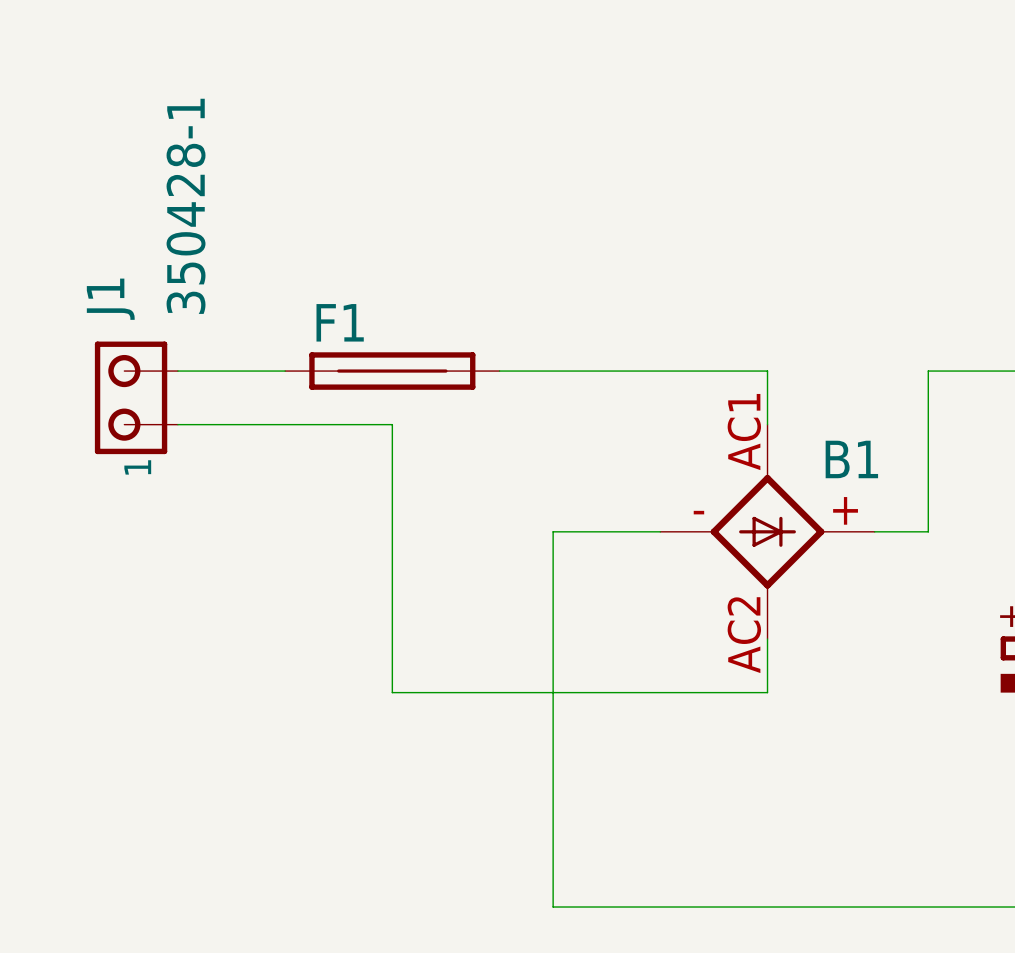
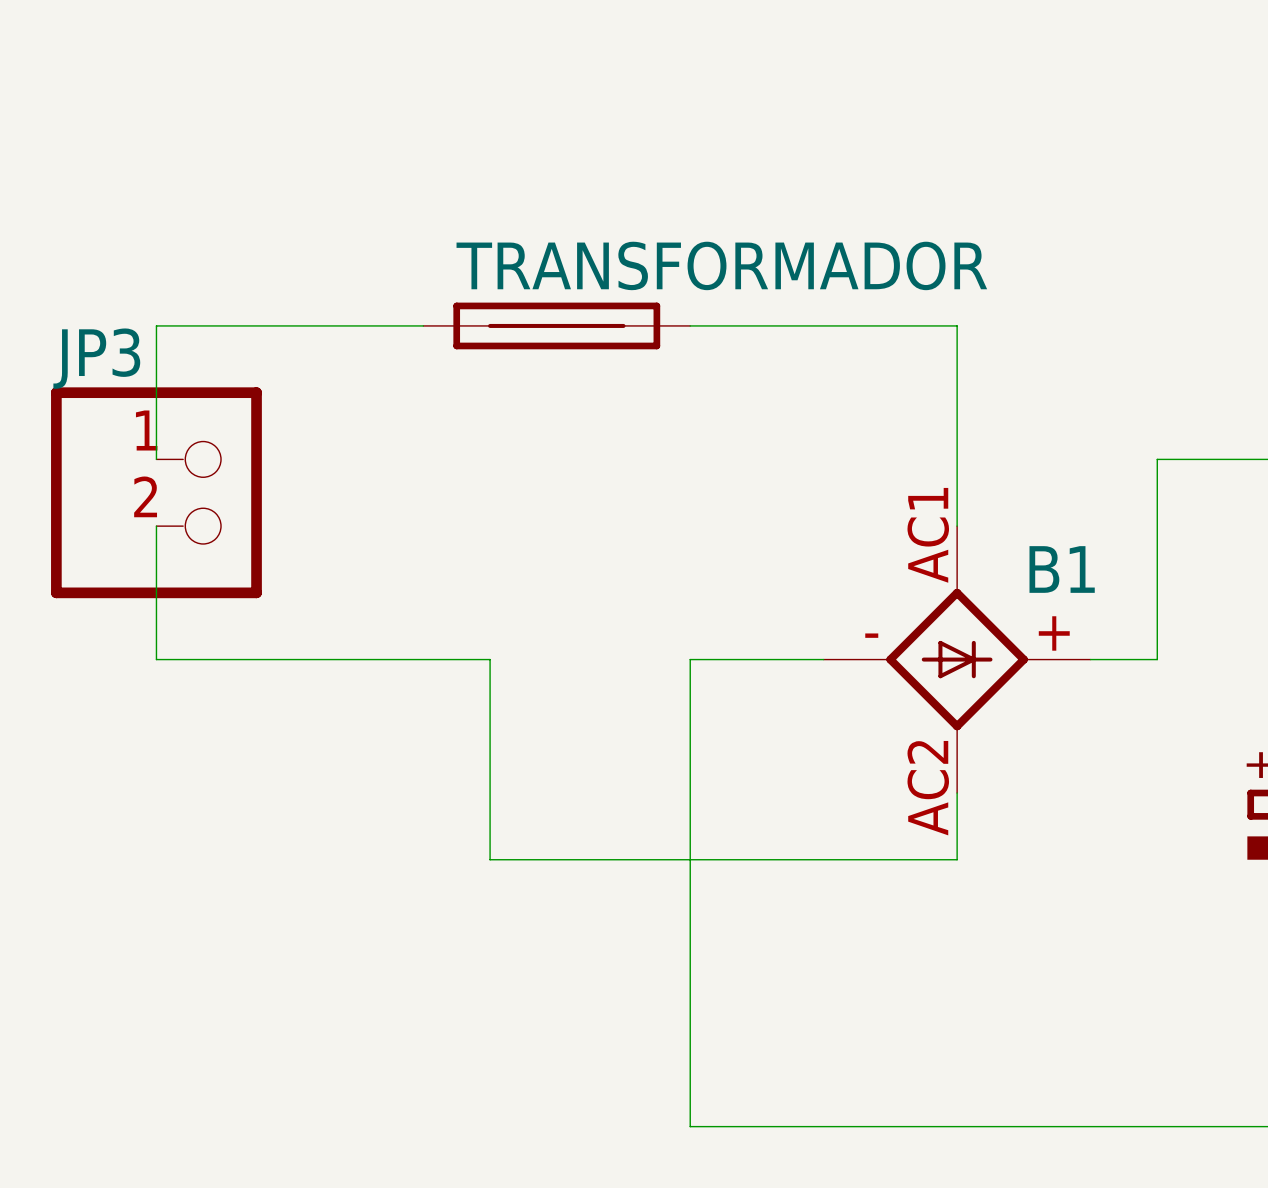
wire: none -> (423, 325) (156, 325) (156, 459)
TRANSFORMADOR: none -> (556, 325)
wire: (177, 371) (285, 371) -> none
F1: (392, 371) -> none
wire: (499, 371) (767, 371) -> (690, 325) (957, 325) (957, 459)
JP3: none -> (156, 492)
J1: 350428-1 (136, 397) -> none
wire: (177, 424) (392, 424) (392, 531) -> (156, 526) (156, 659) (490, 659)

